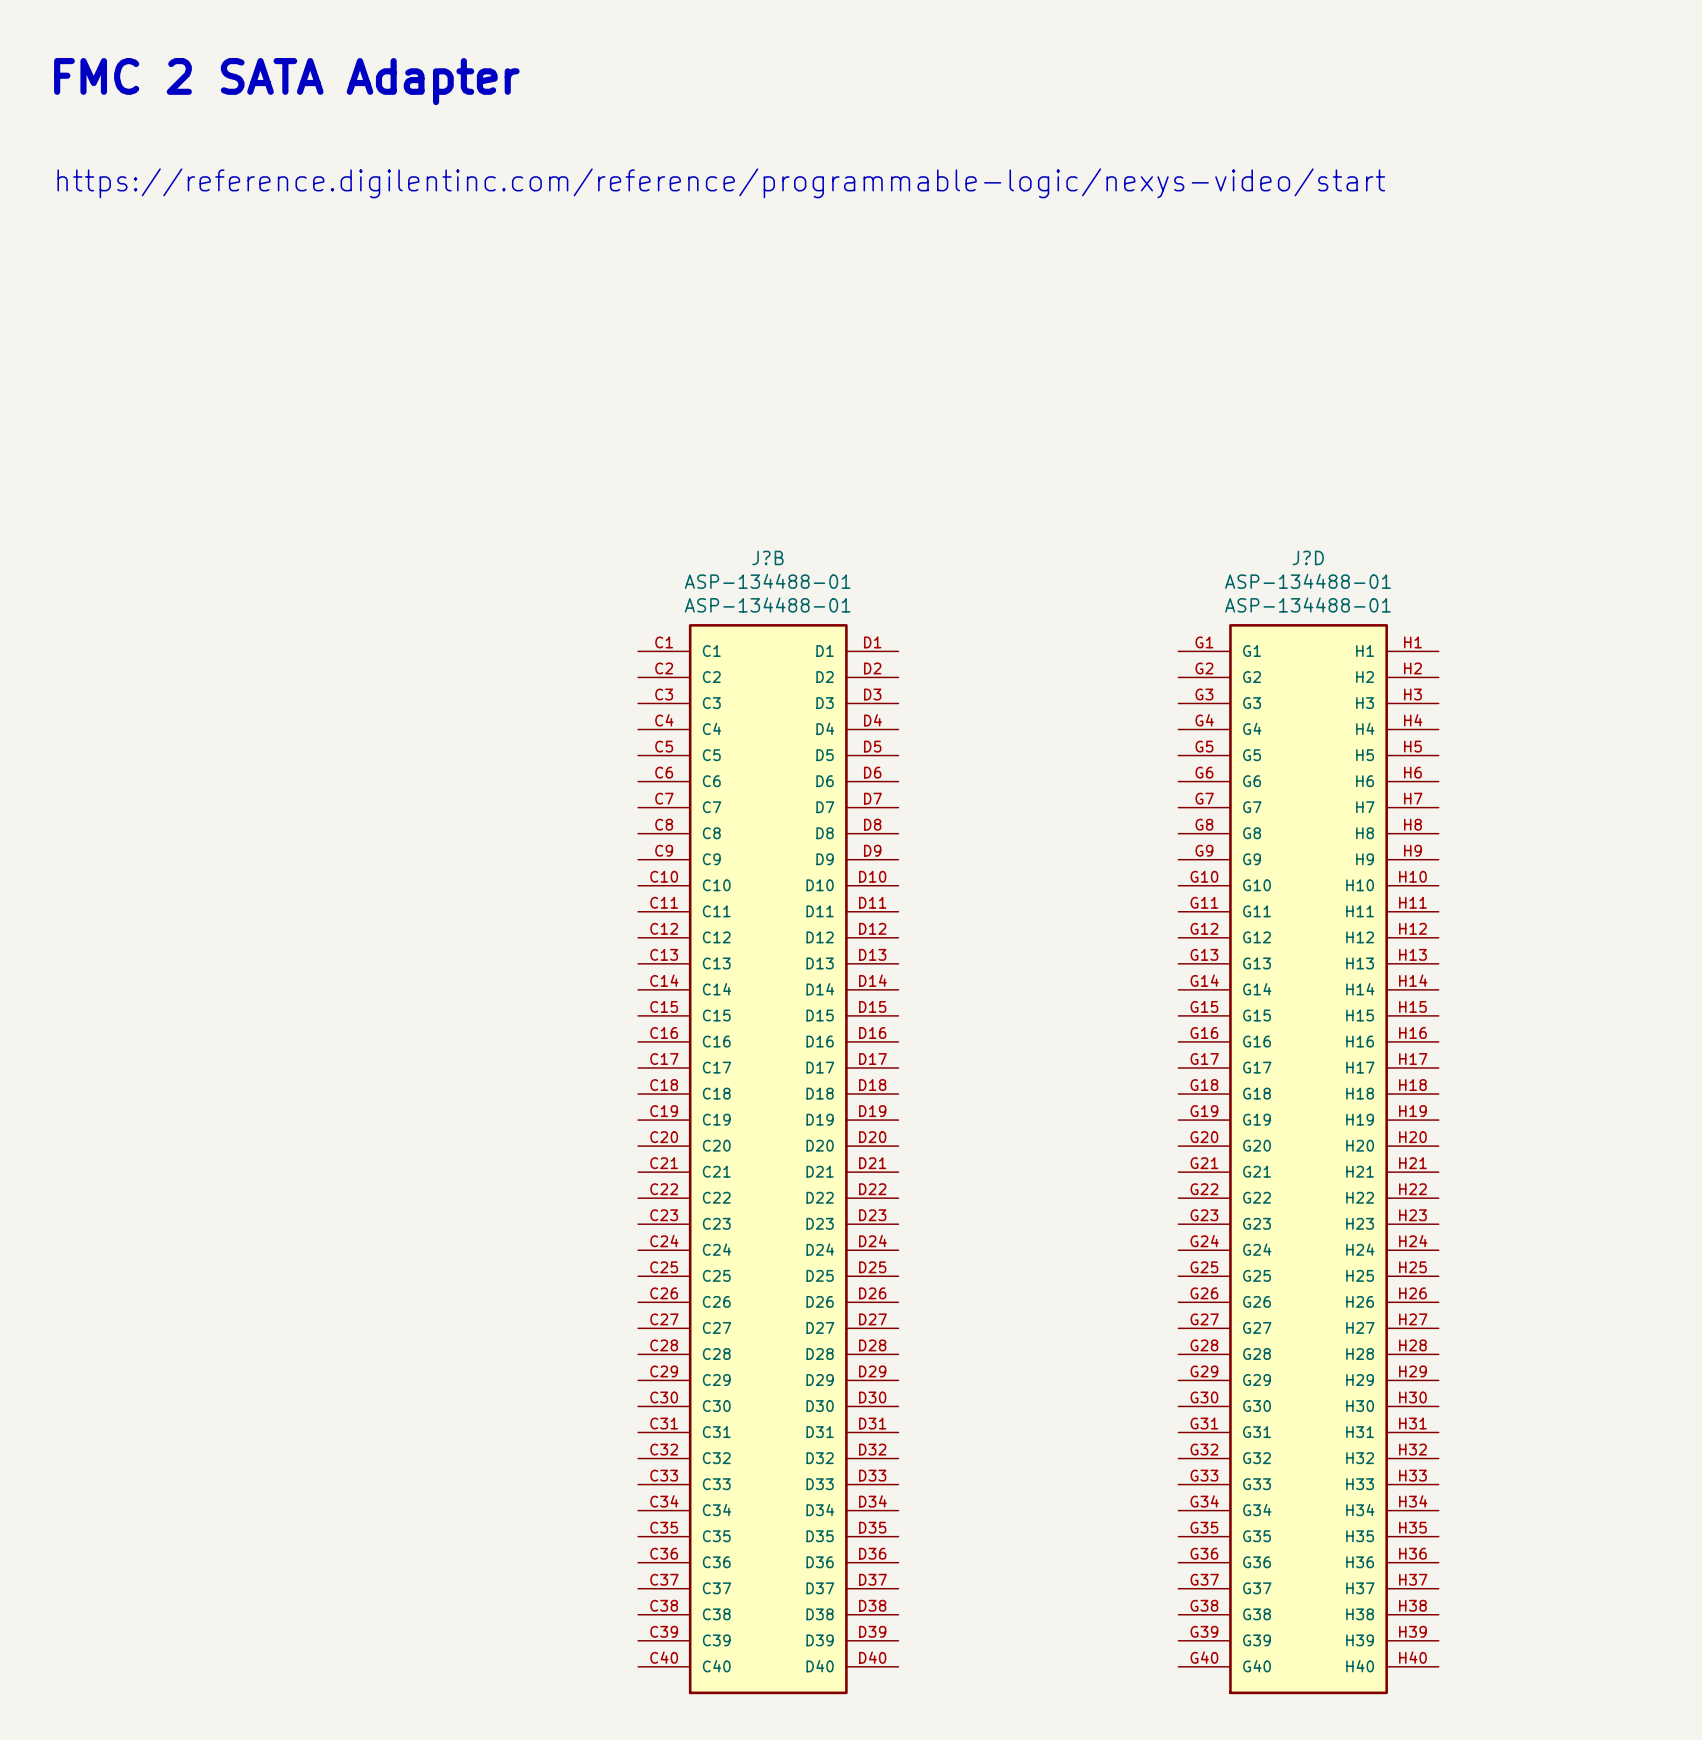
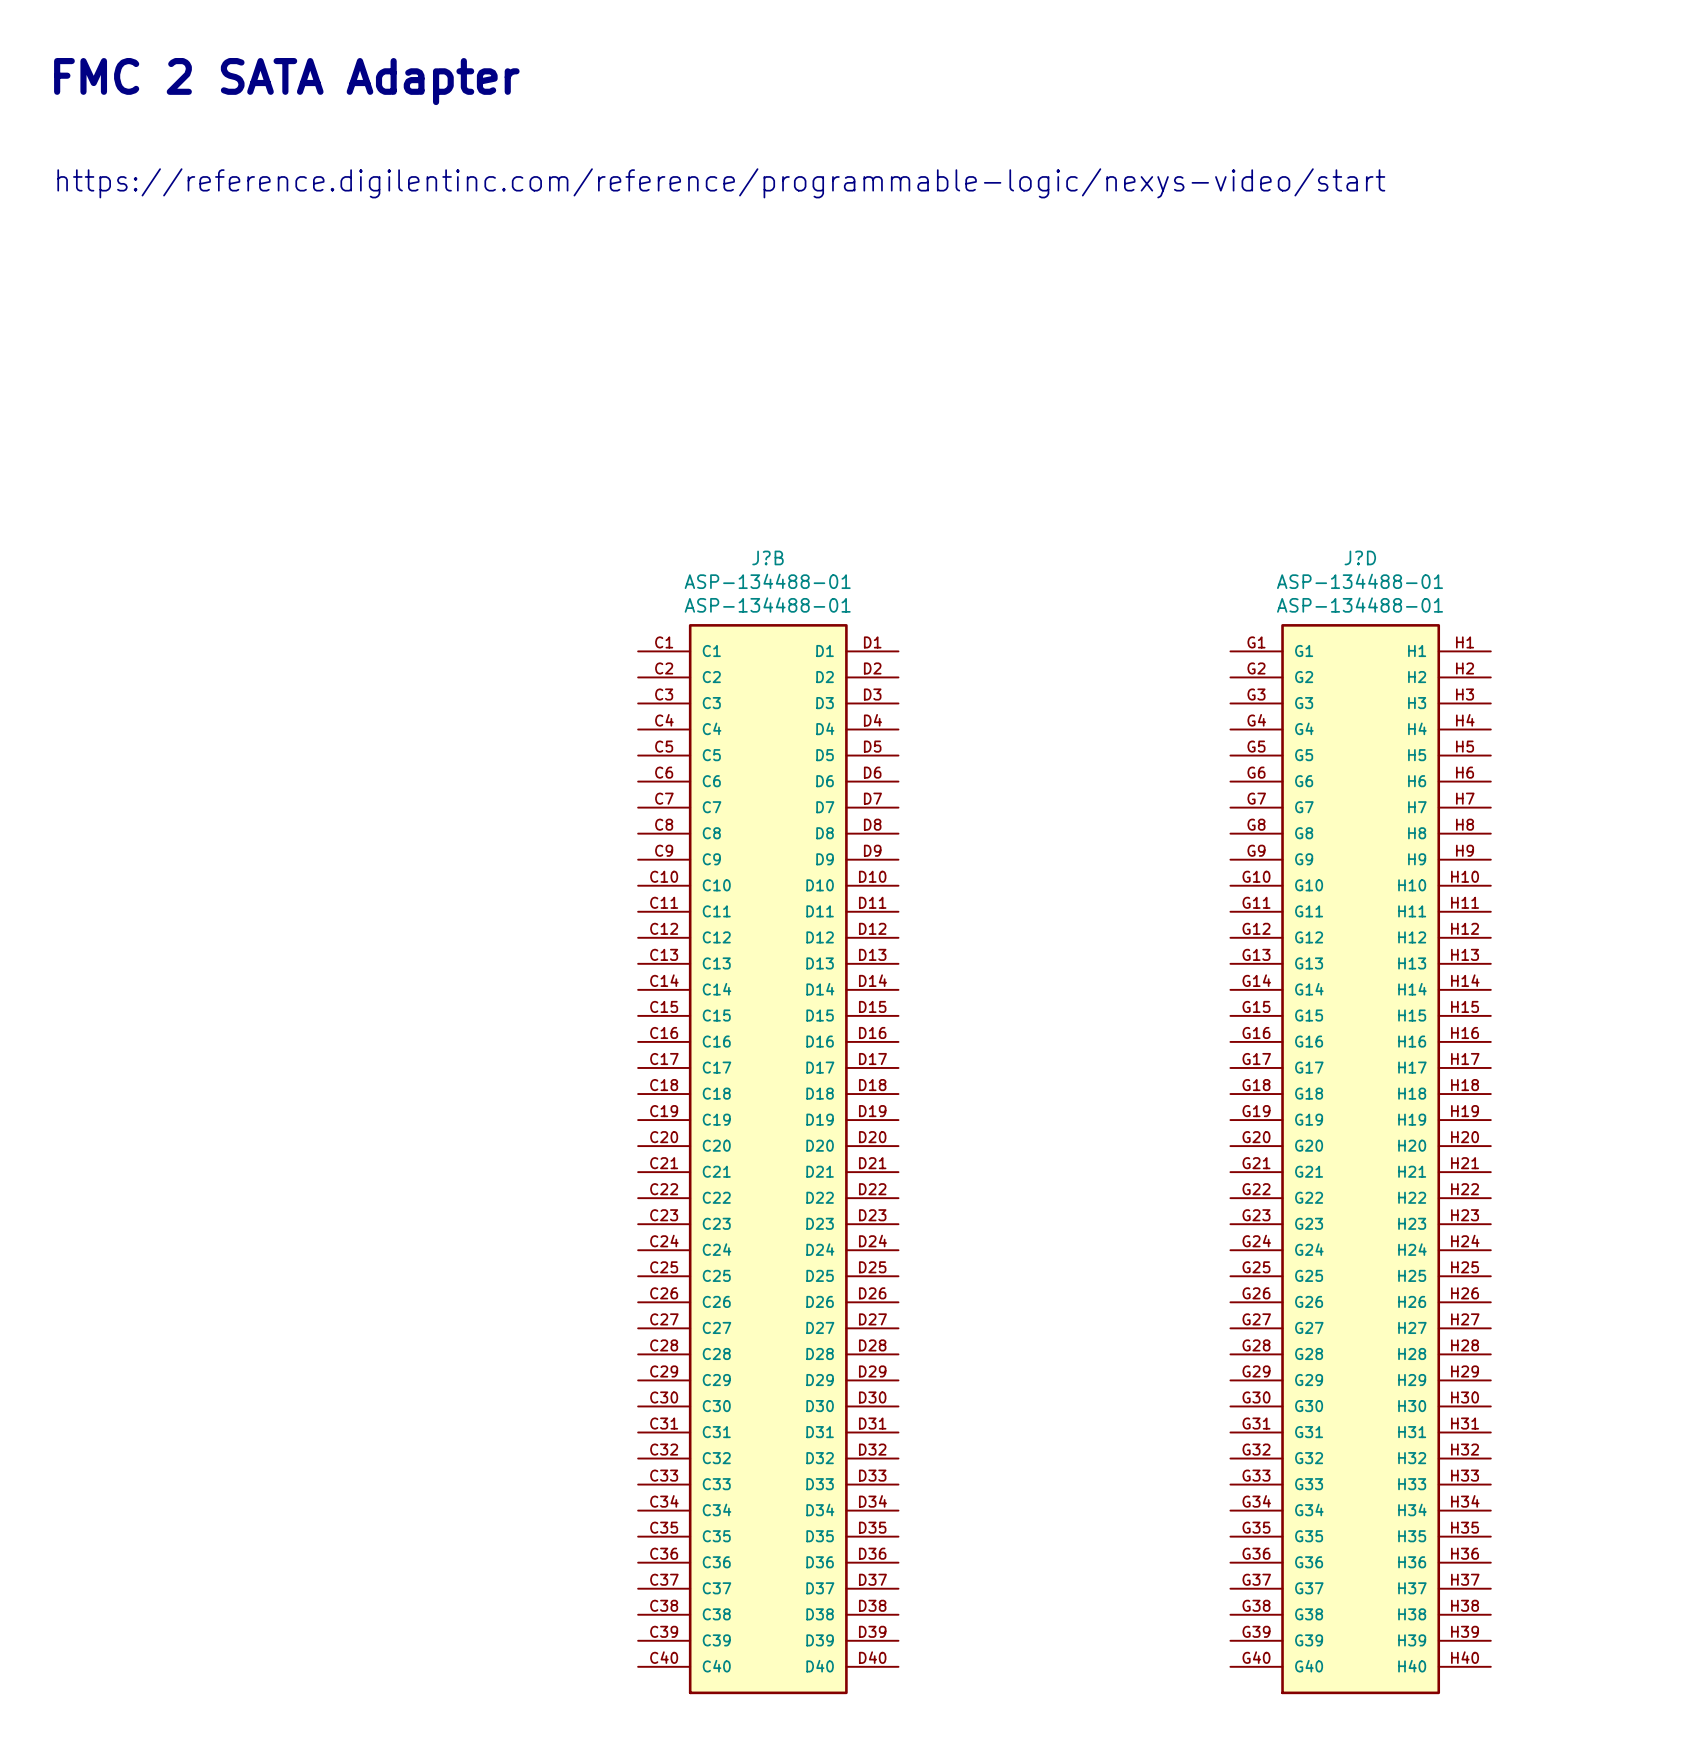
J?D position: (1308, 1159) -> (1360, 1159)

